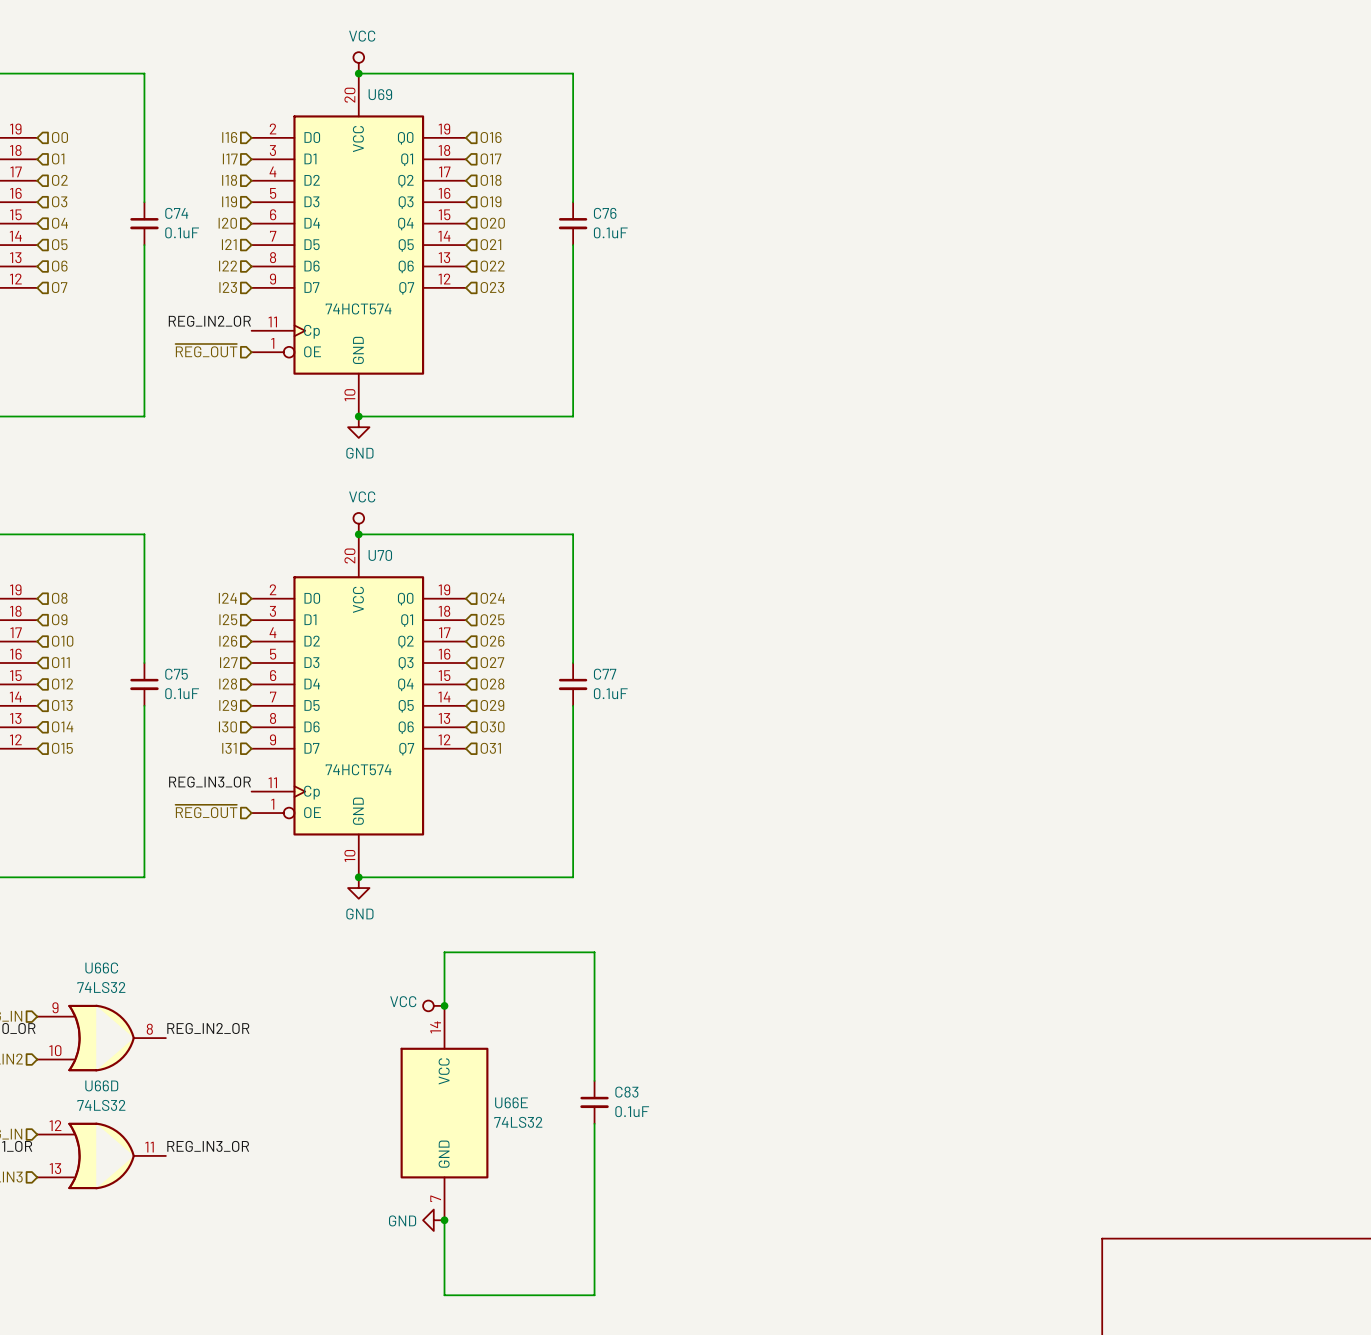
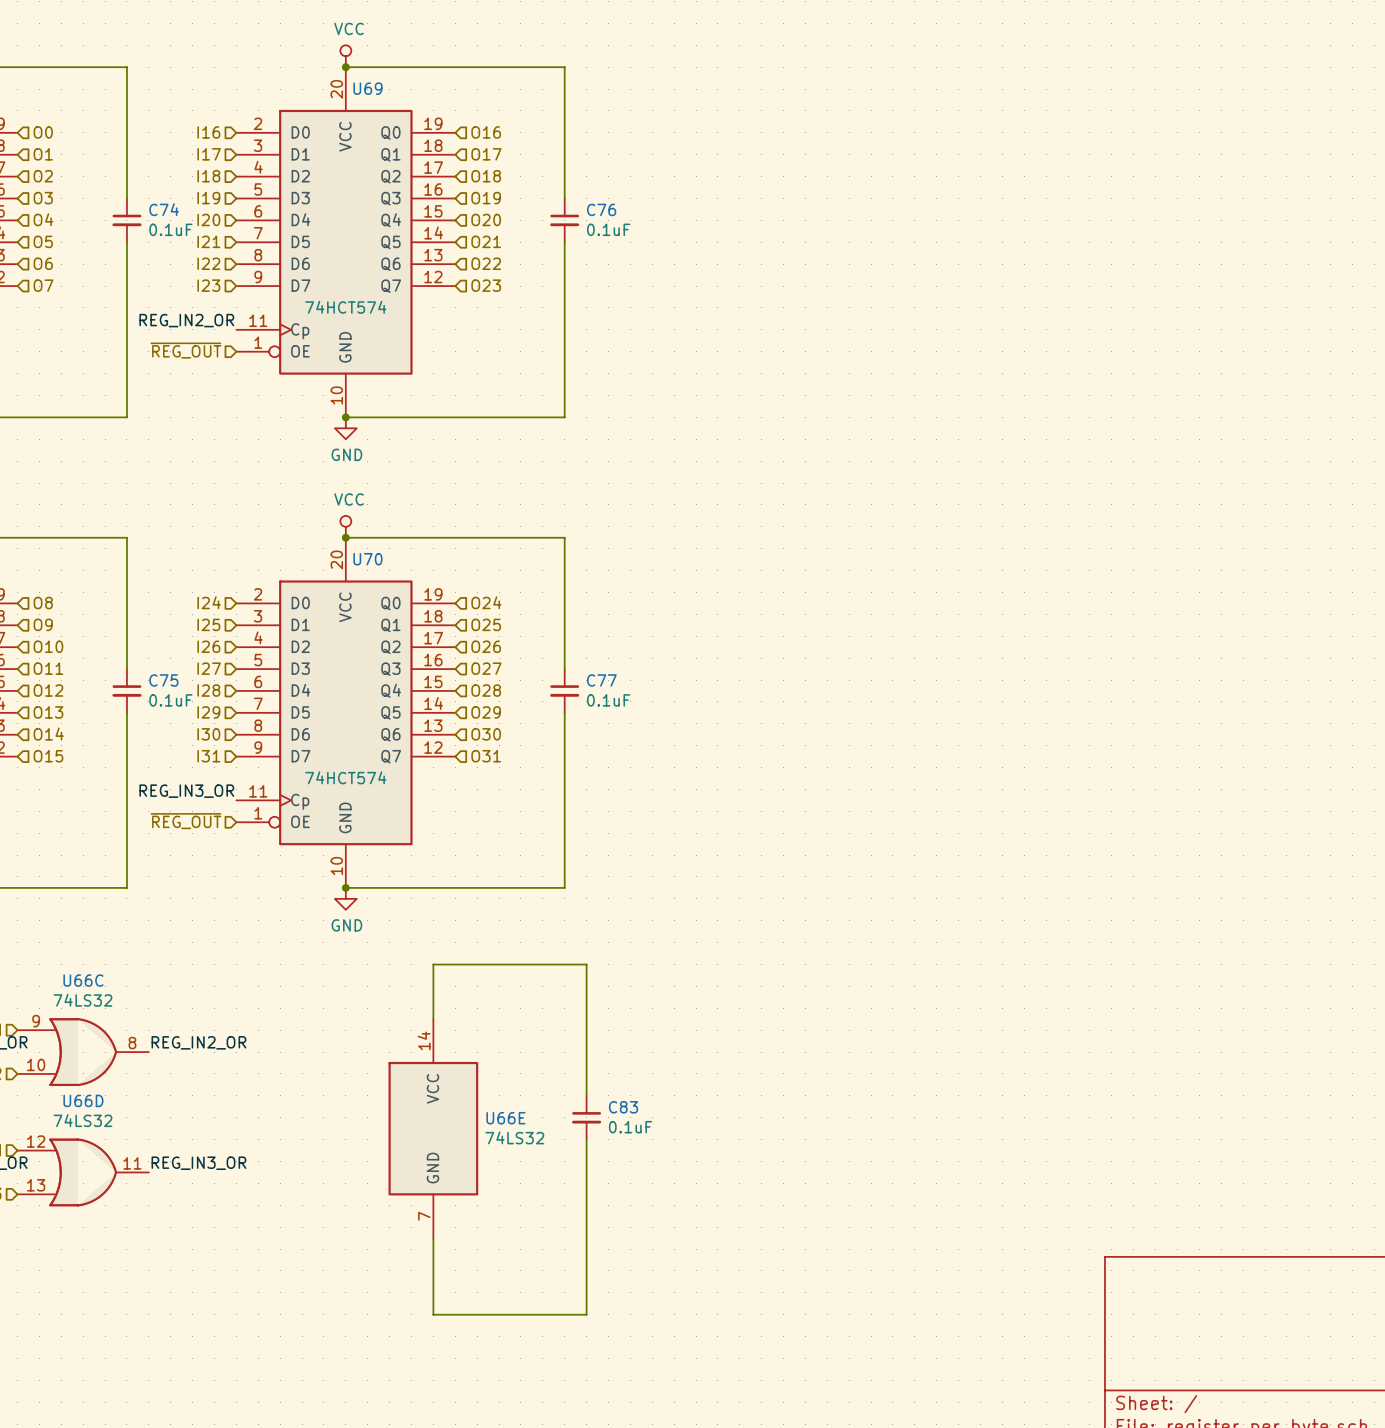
power symbol: VCC (433, 1005) -> none
junction: (444, 1005) -> none
power symbol: GND (433, 1220) -> none
junction: (444, 1220) -> none

